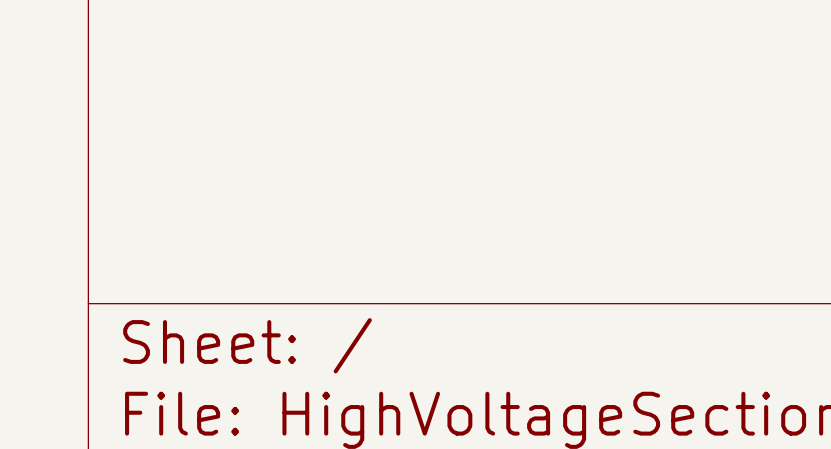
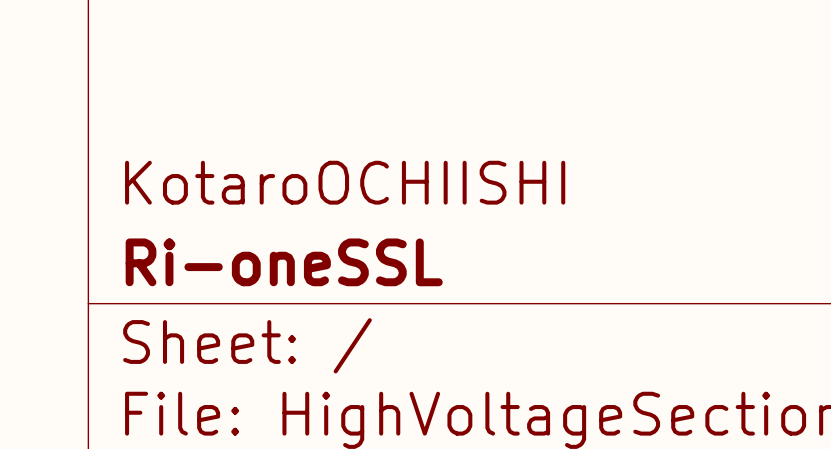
title block: none -> KotaroOCHIISHI (345, 182)
title block: none -> Ri-oneSSL (284, 262)

